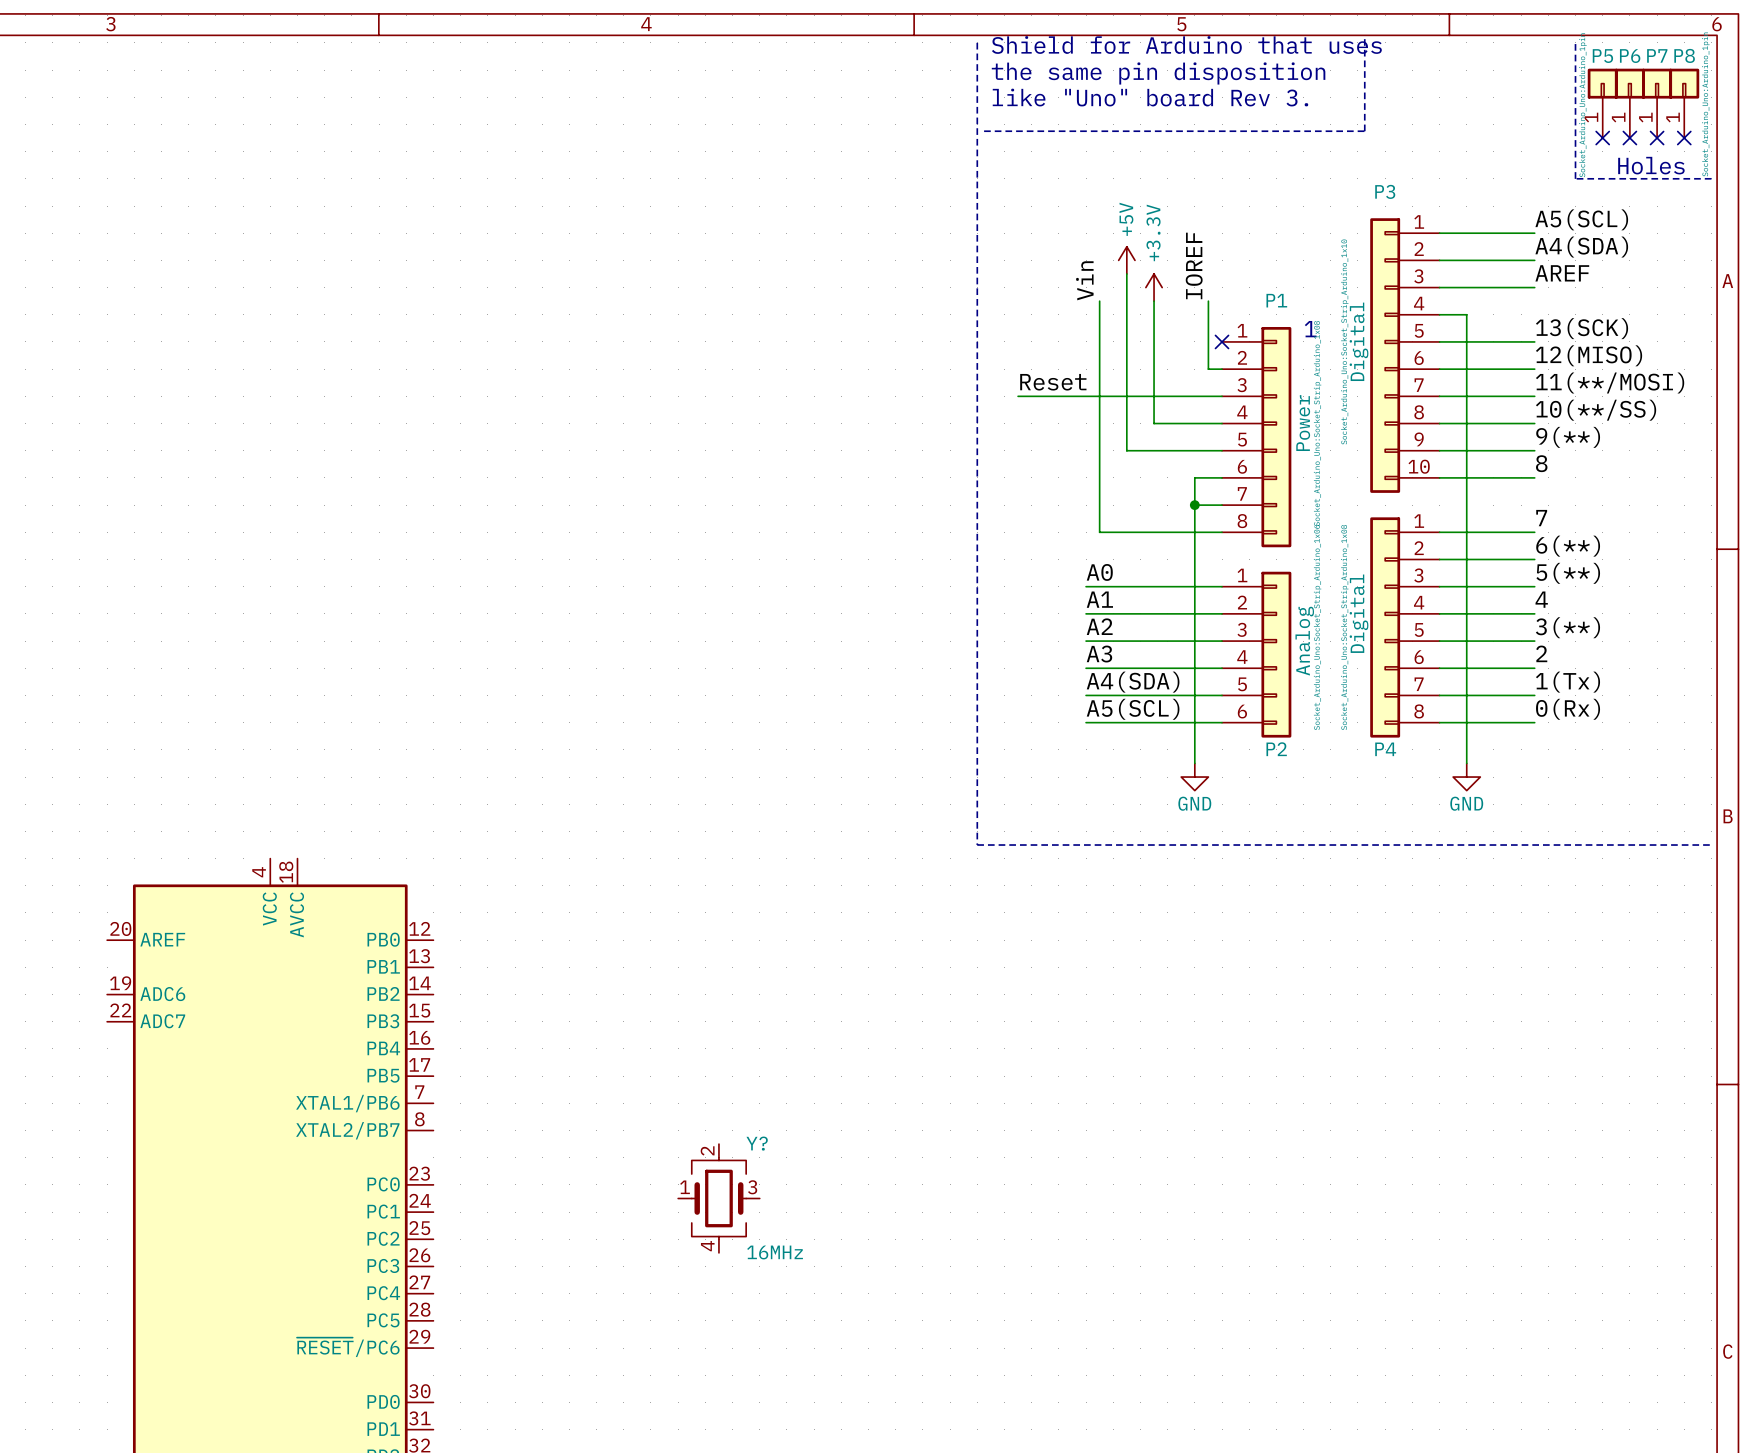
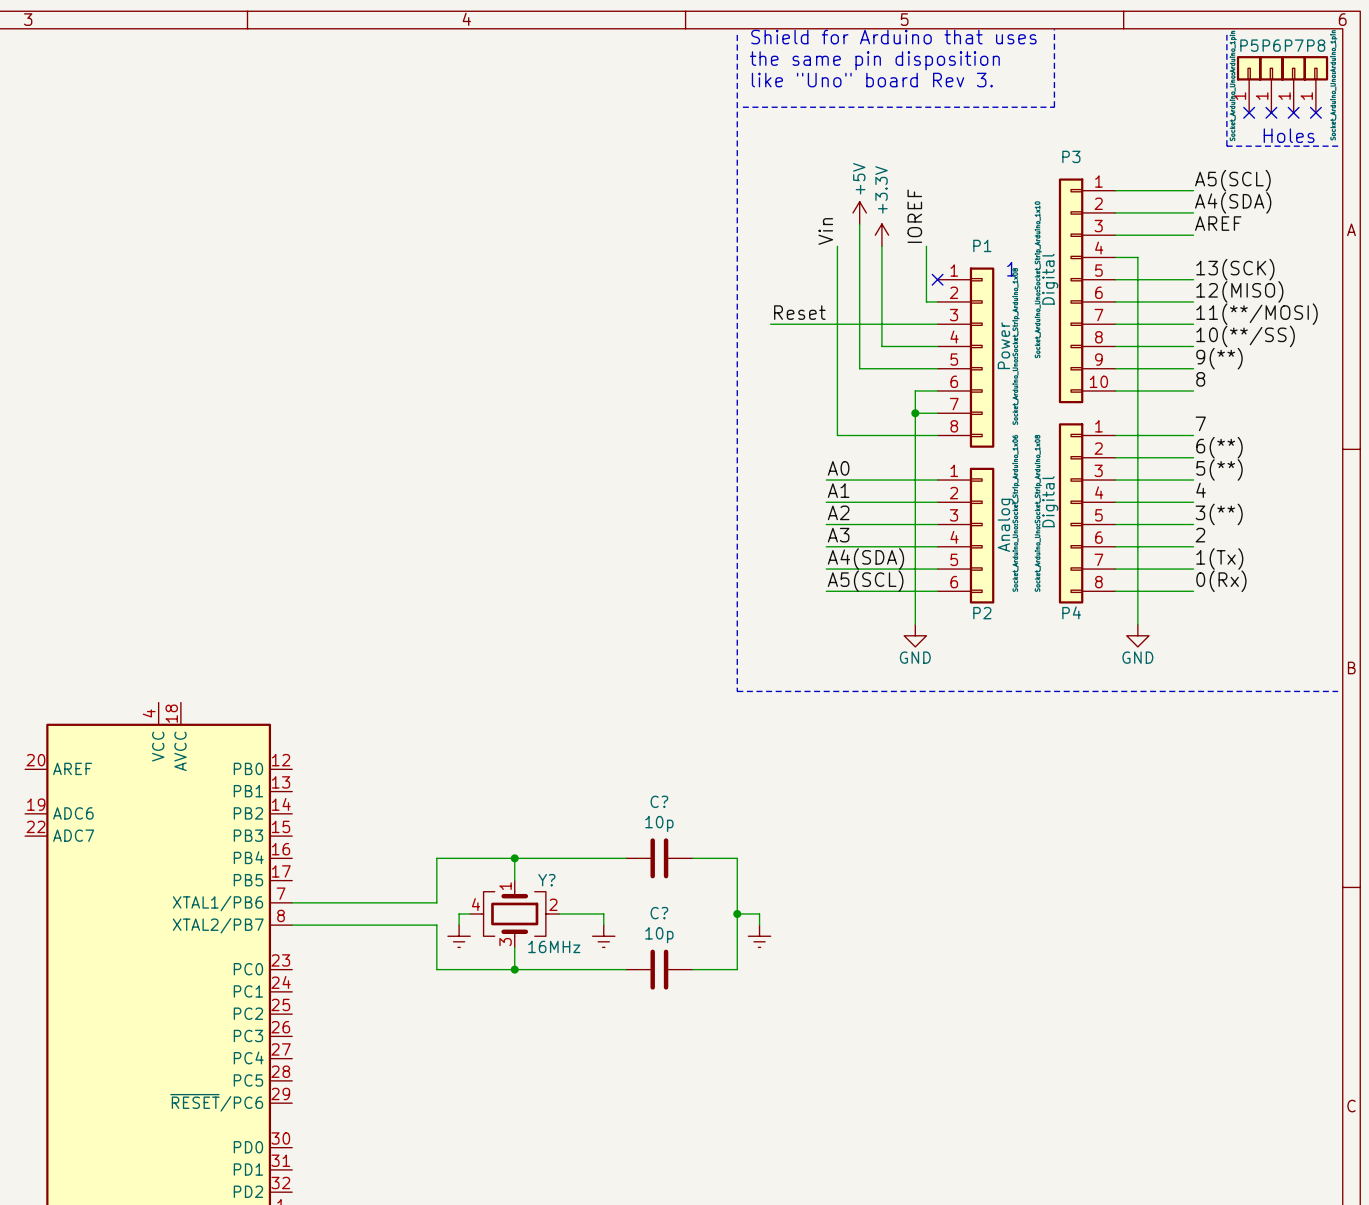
wire: none -> (514, 858) (514, 880)
junction: none -> (514, 858)
wire: none -> (626, 858) (436, 858) (436, 902) (292, 902)
C?: none -> 10p (659, 858)
wire: none -> (692, 858) (737, 858) (737, 969) (692, 969)
wire: none -> (470, 913) (459, 913) (459, 925)
wire: none -> (559, 913) (603, 913) (603, 925)
wire: none -> (737, 913) (759, 913) (759, 925)
junction: none -> (737, 913)
wire: none -> (292, 925) (436, 925) (436, 969) (626, 969)
power symbol: none -> (459, 936)
power symbol: none -> (603, 936)
power symbol: none -> (759, 936)
wire: none -> (514, 947) (514, 969)
junction: none -> (514, 969)
C?: none -> 10p (659, 969)
Y? rotation: 0° (718, 1198) -> 90° clockwise (514, 913)
Y? position: (718, 1198) -> (514, 913)

